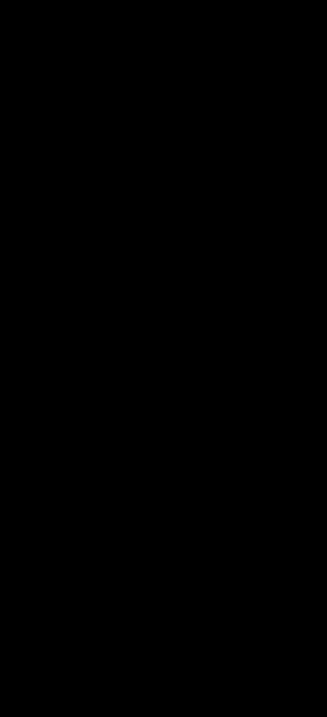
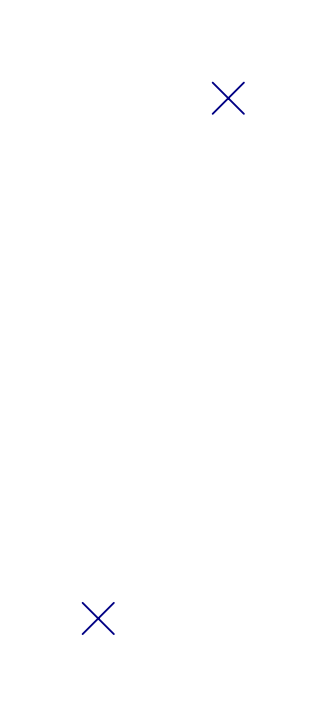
no-connect mark: none -> (228, 98)
no-connect mark: none -> (98, 618)

